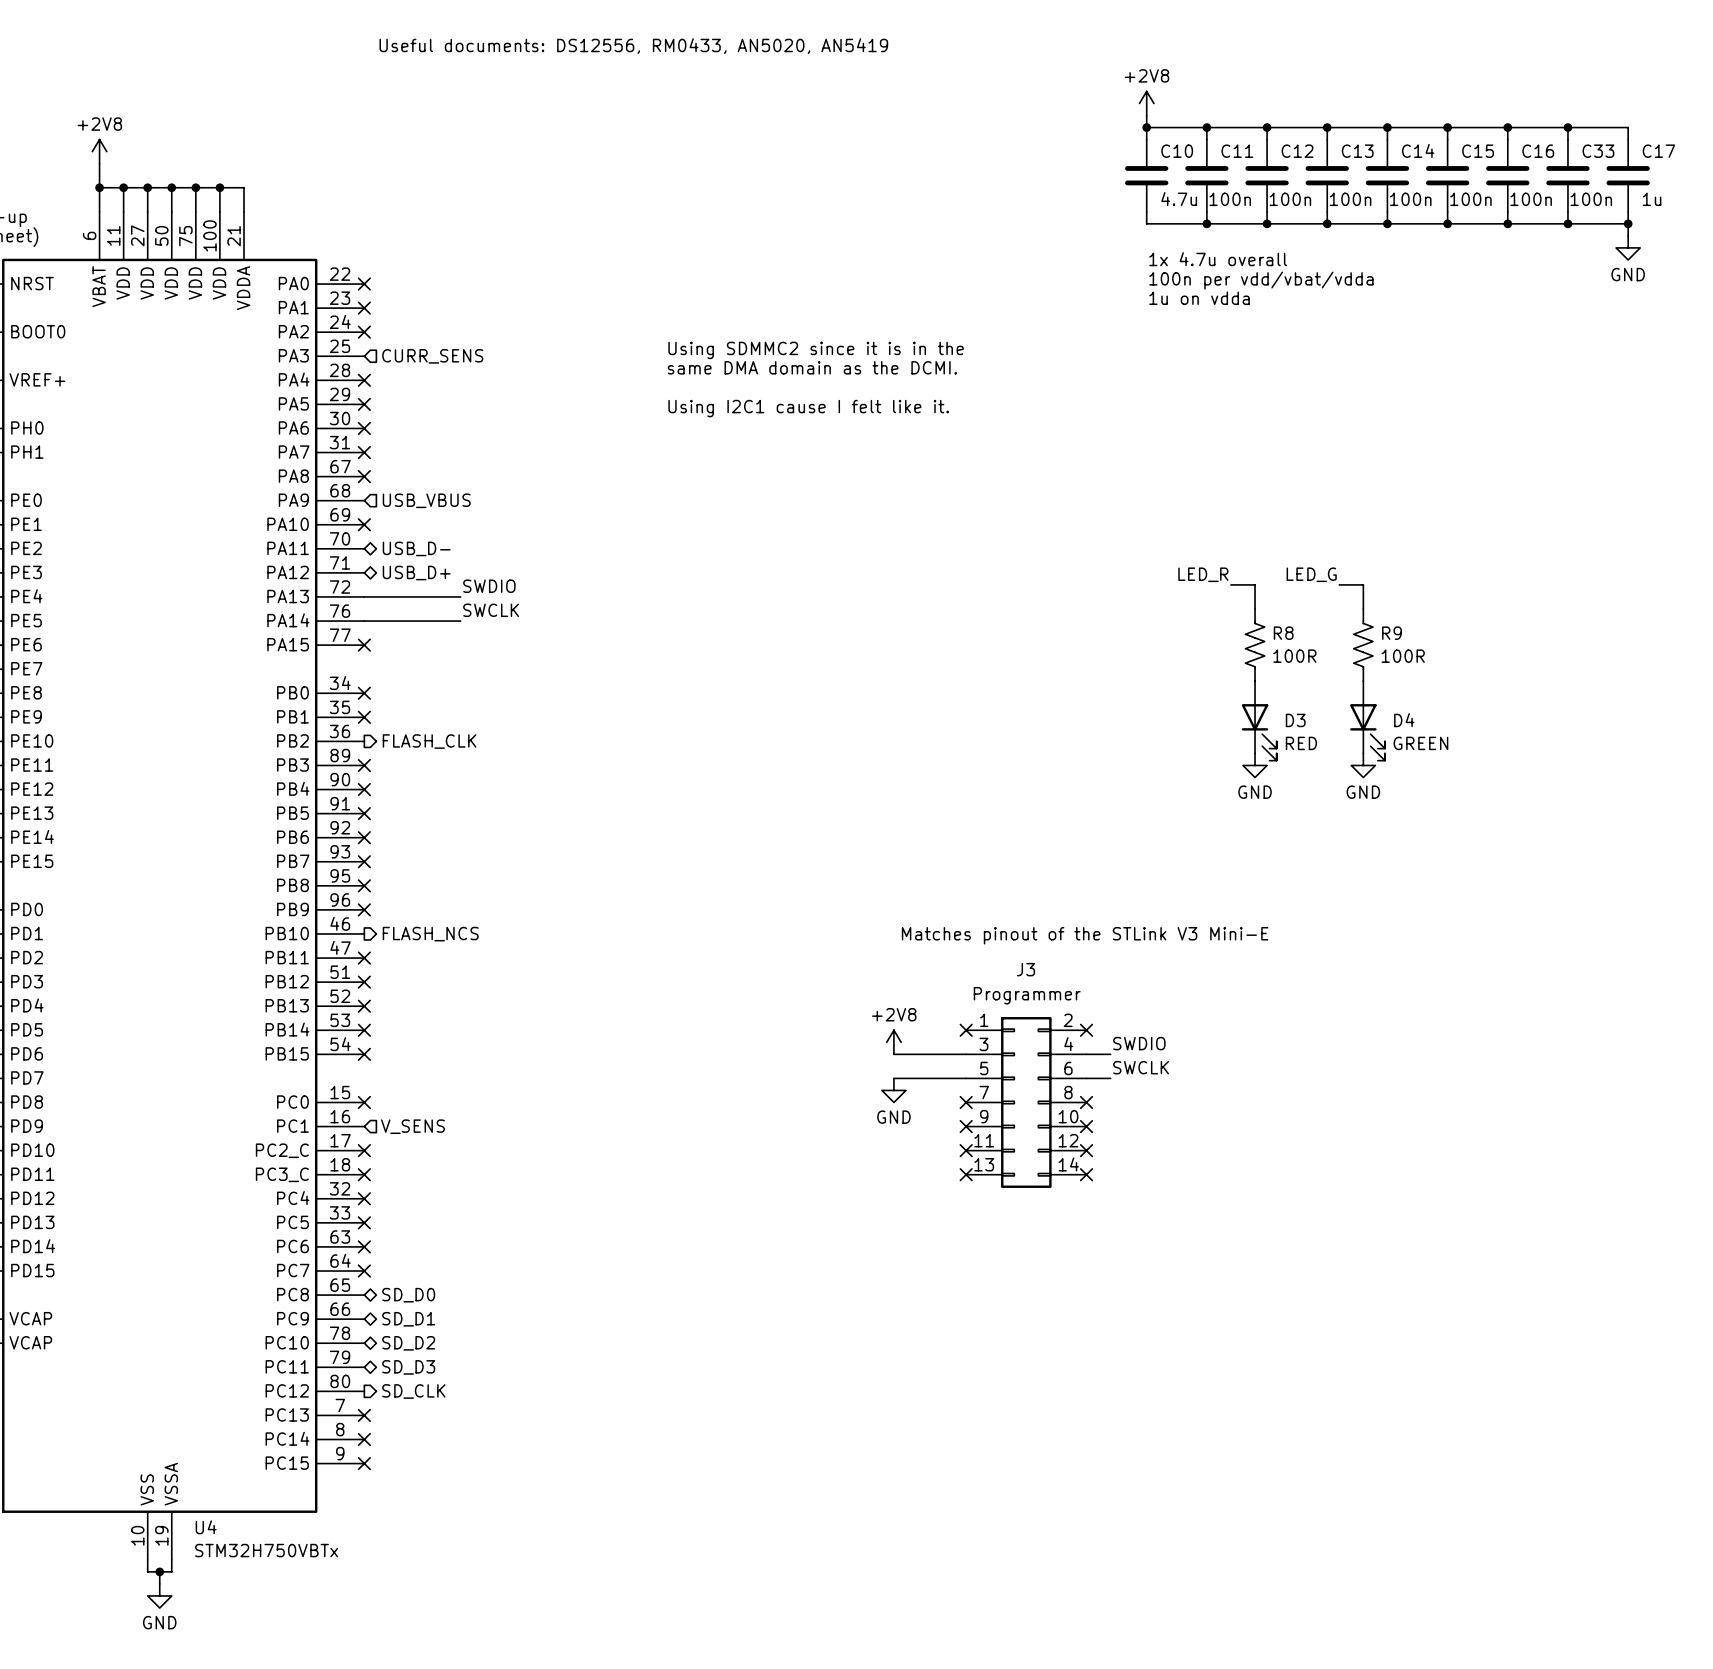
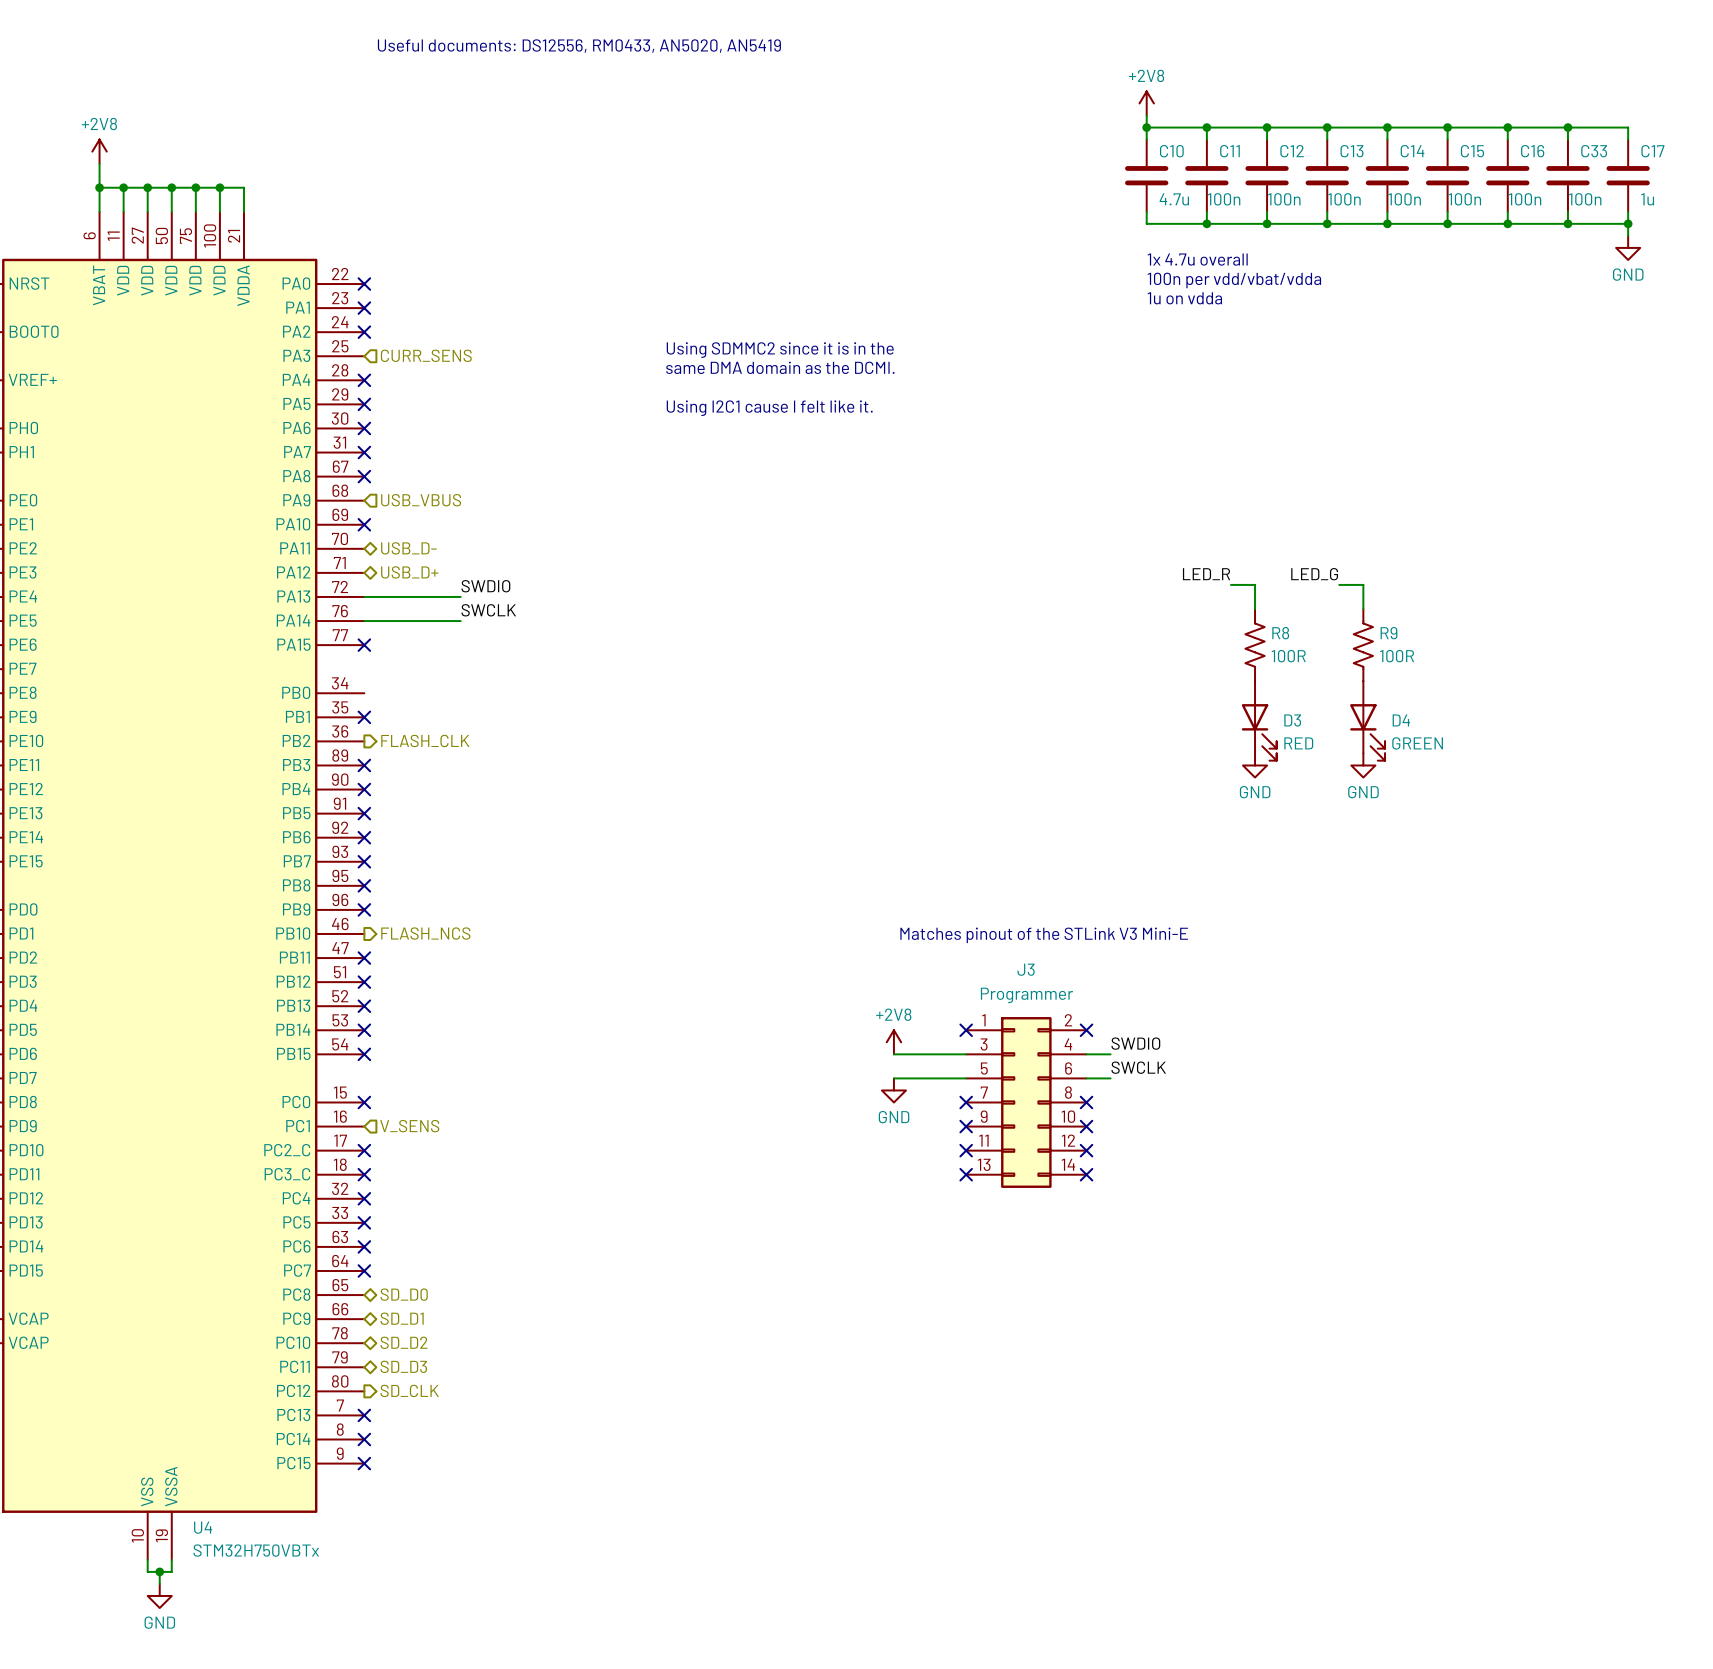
no-connect mark: (364, 693) -> none

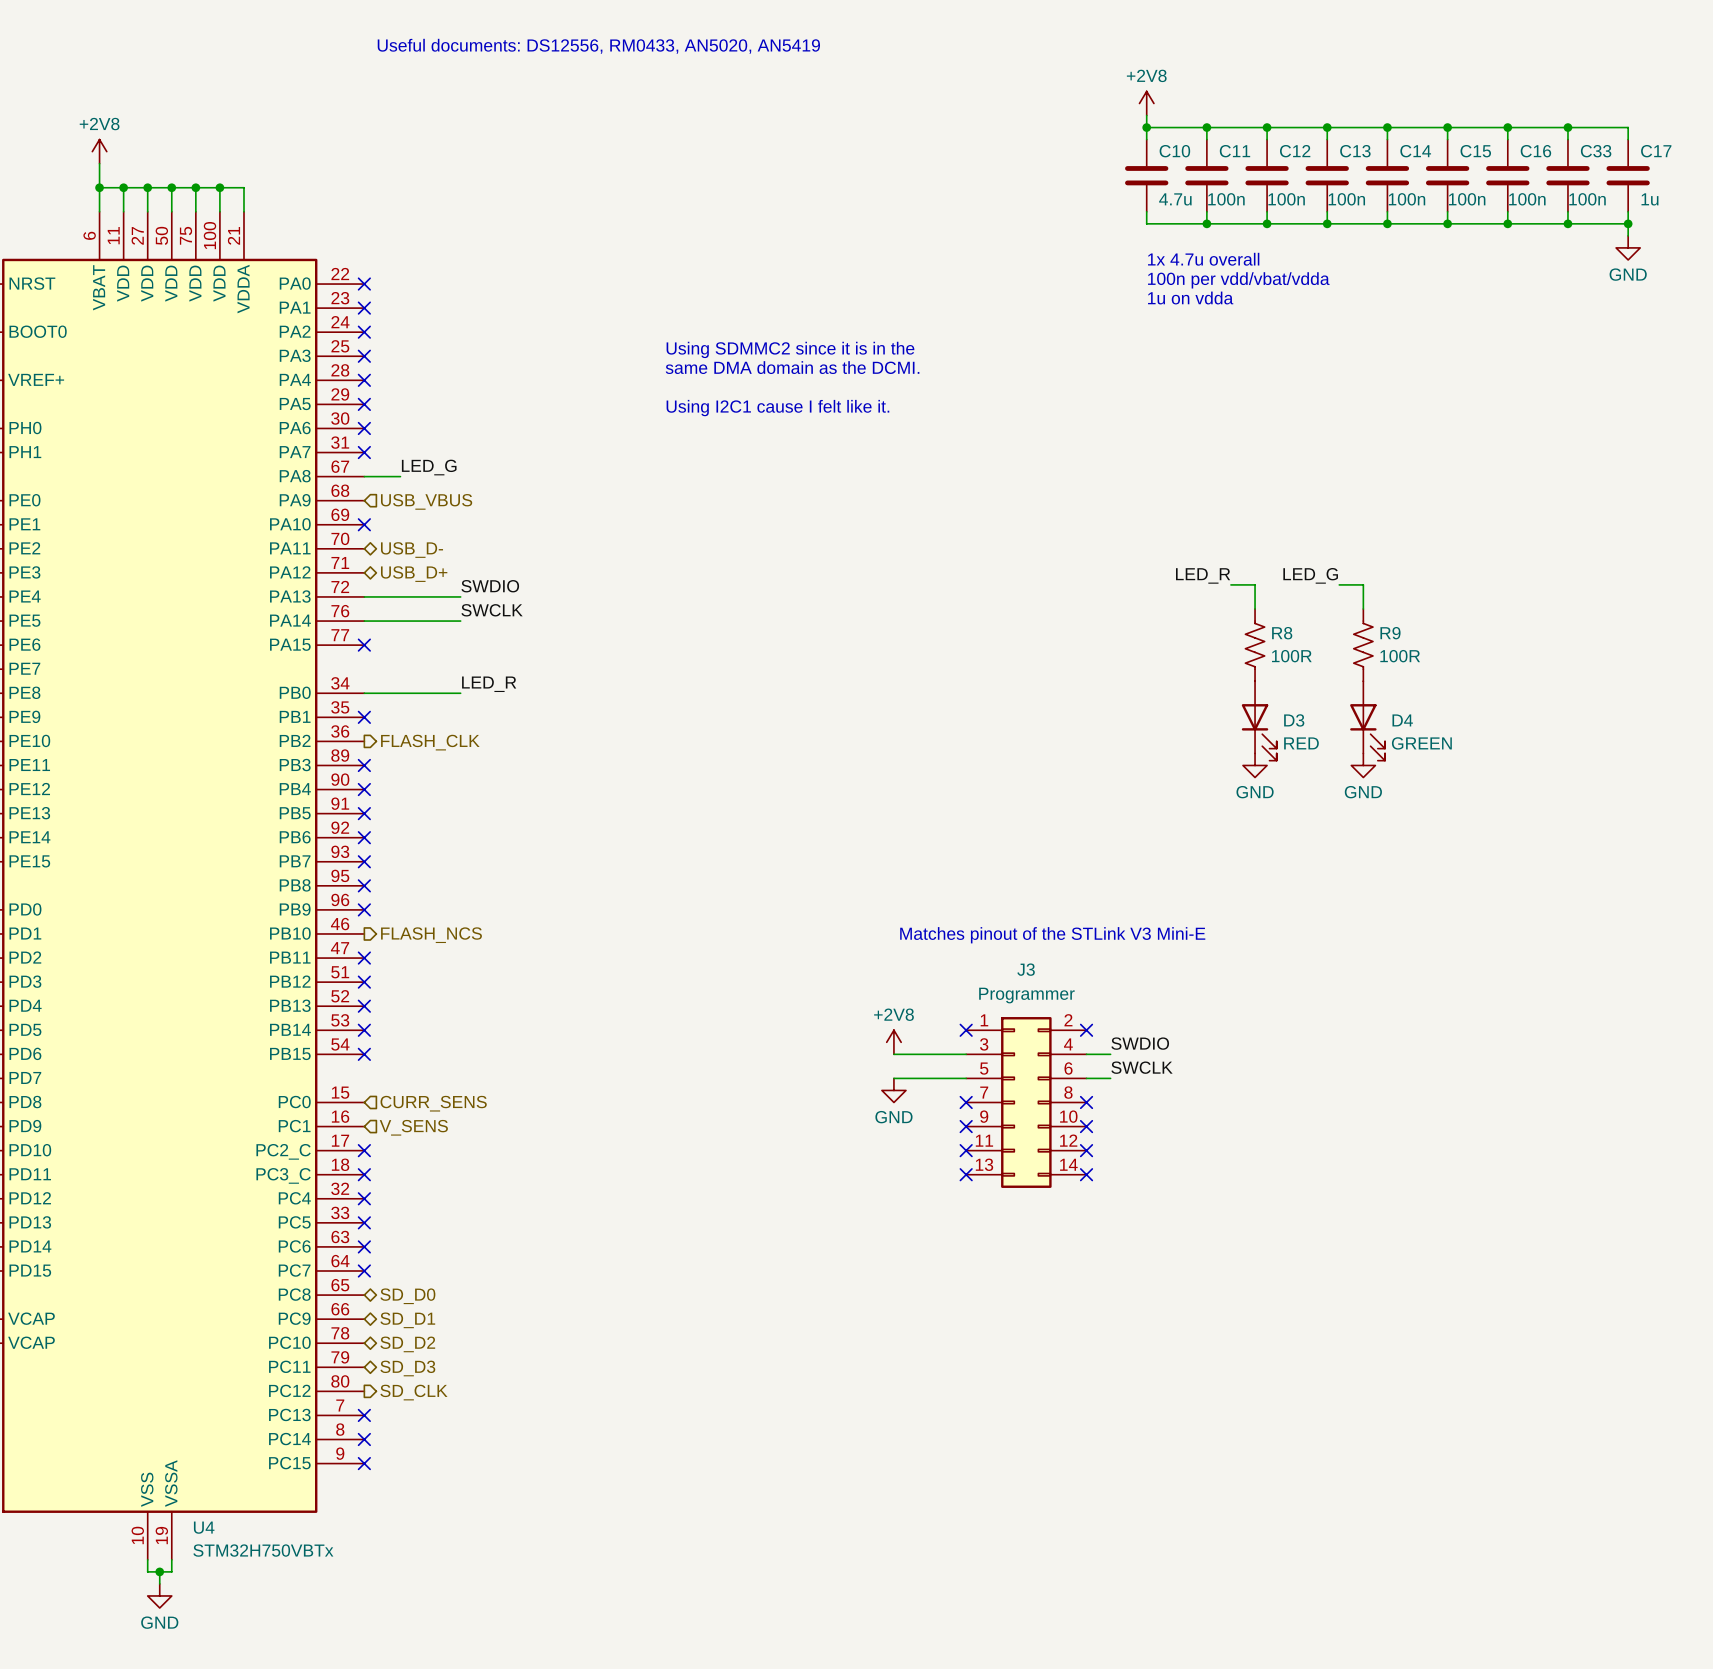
hierarchical label: CURR_SENS (426, 355) -> none
no-connect mark: none -> (364, 356)
label: none -> LED_G (429, 467)
wire: none -> (364, 476) (400, 476)
no-connect mark: (364, 476) -> none
label: none -> LED_R (489, 684)
wire: none -> (364, 693) (460, 693)
no-connect mark: (364, 1102) -> none
hierarchical label: none -> CURR_SENS (433, 1103)

